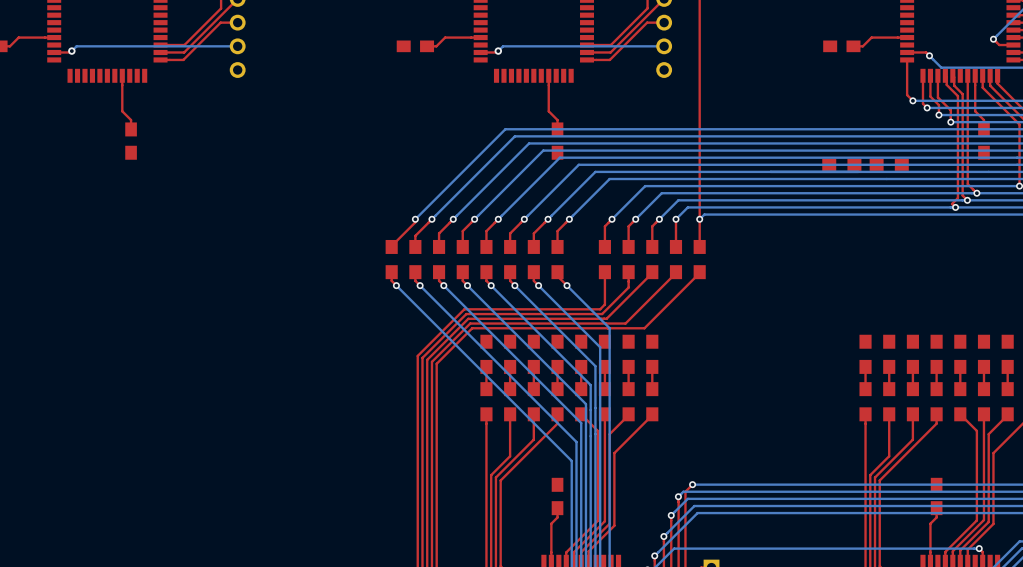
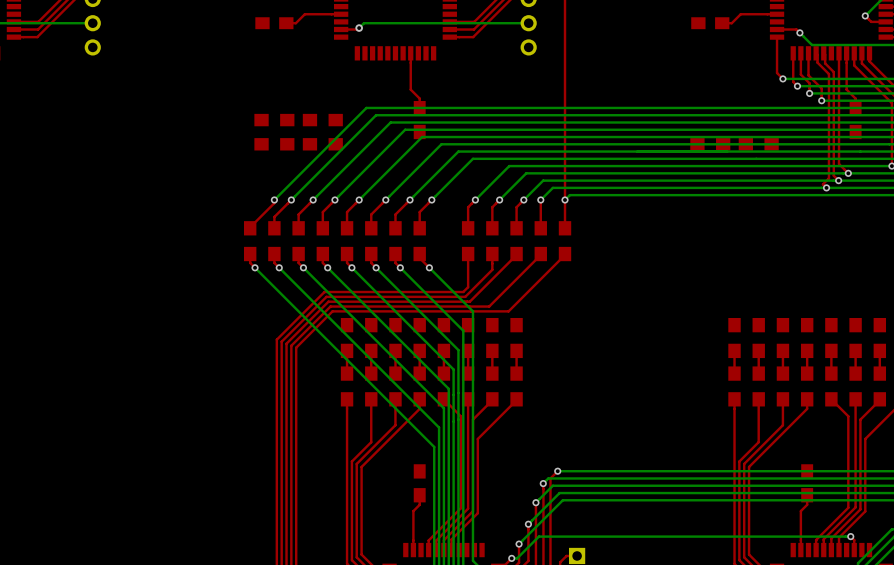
part: none -> (274, 120)
part: none -> (322, 120)
part: none -> (274, 144)
part: none -> (322, 144)

